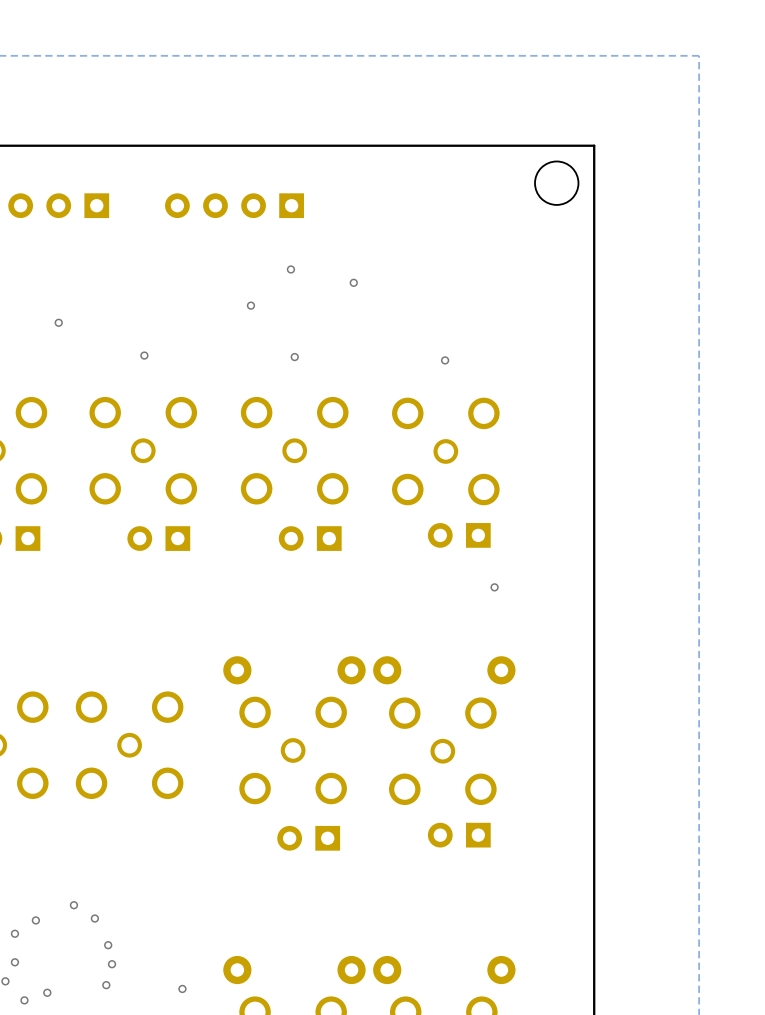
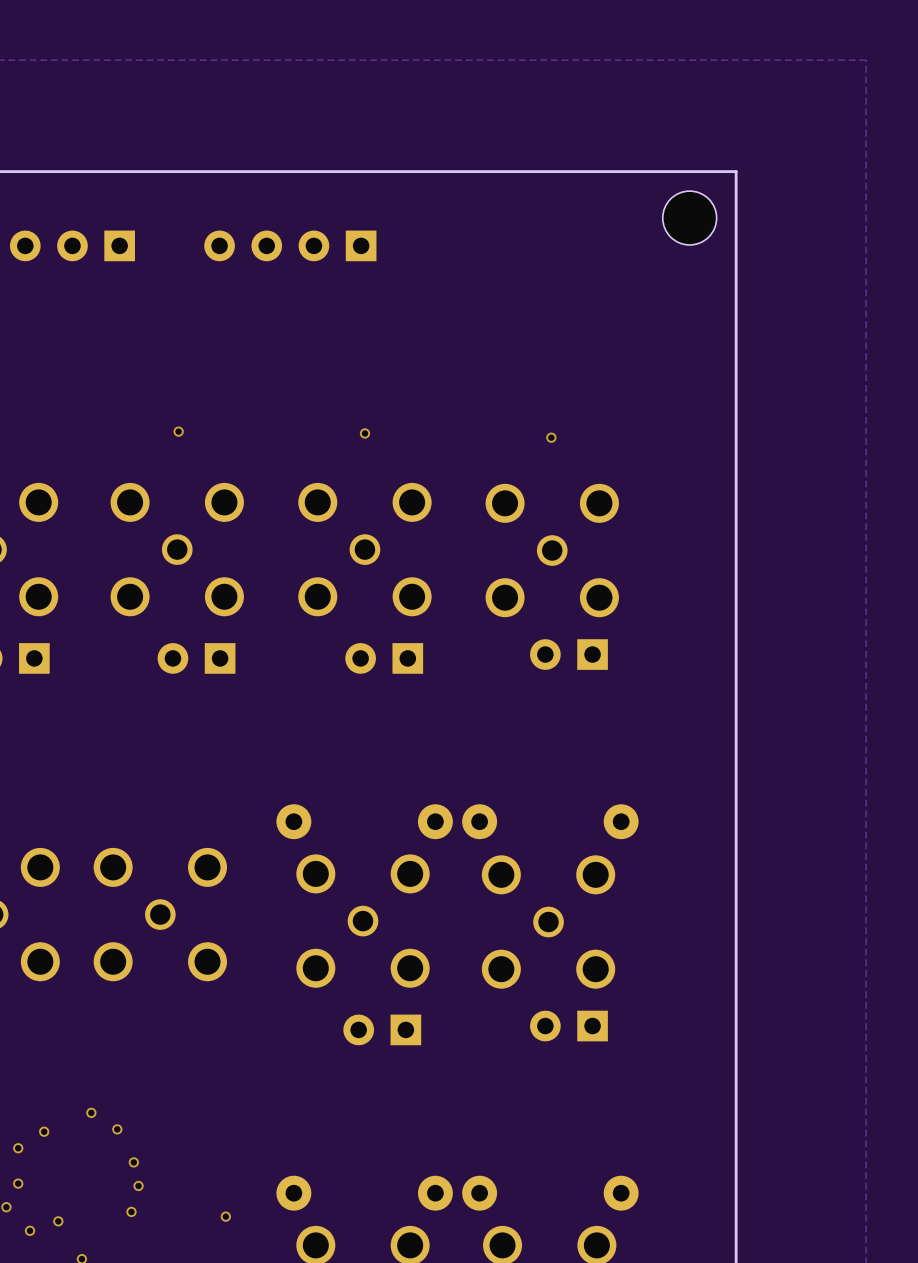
via: (290, 269) -> none
via: (353, 282) -> none
via: (250, 305) -> none
via: (58, 322) -> none
via: (494, 587) -> none

